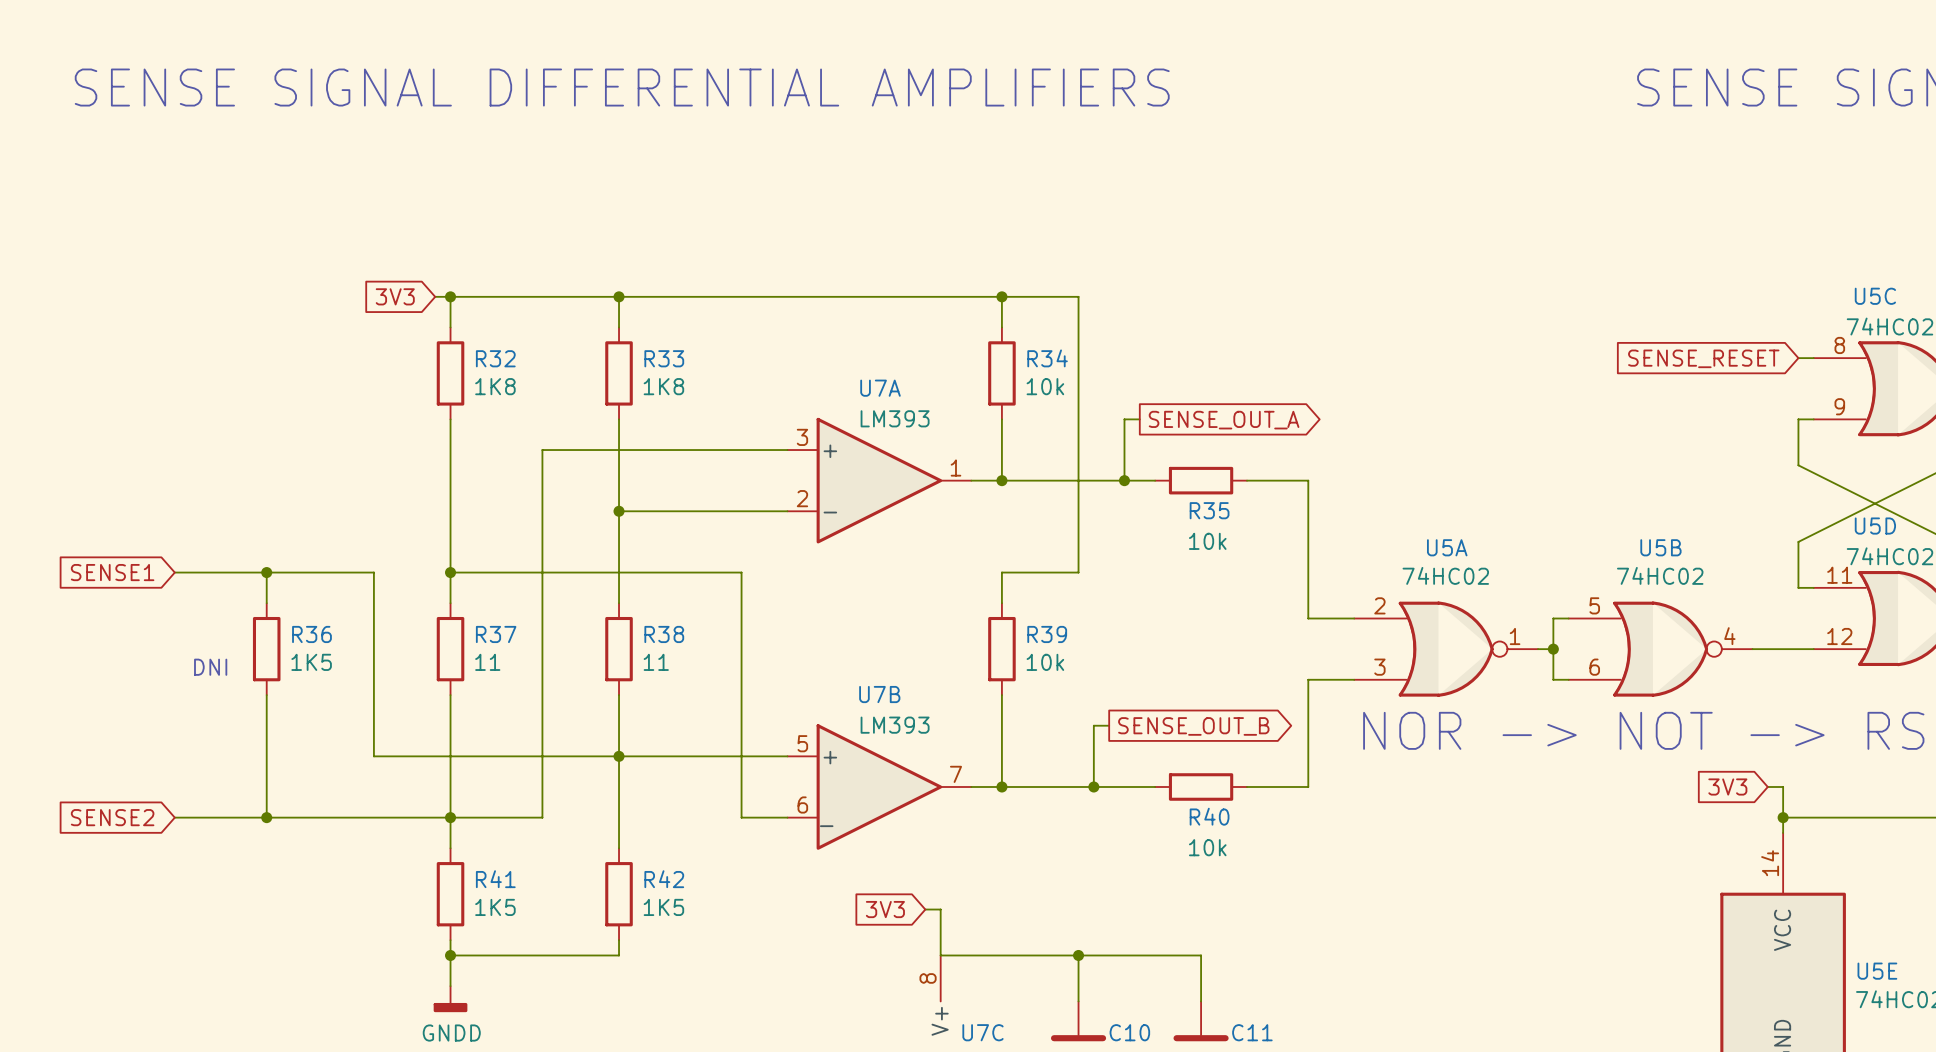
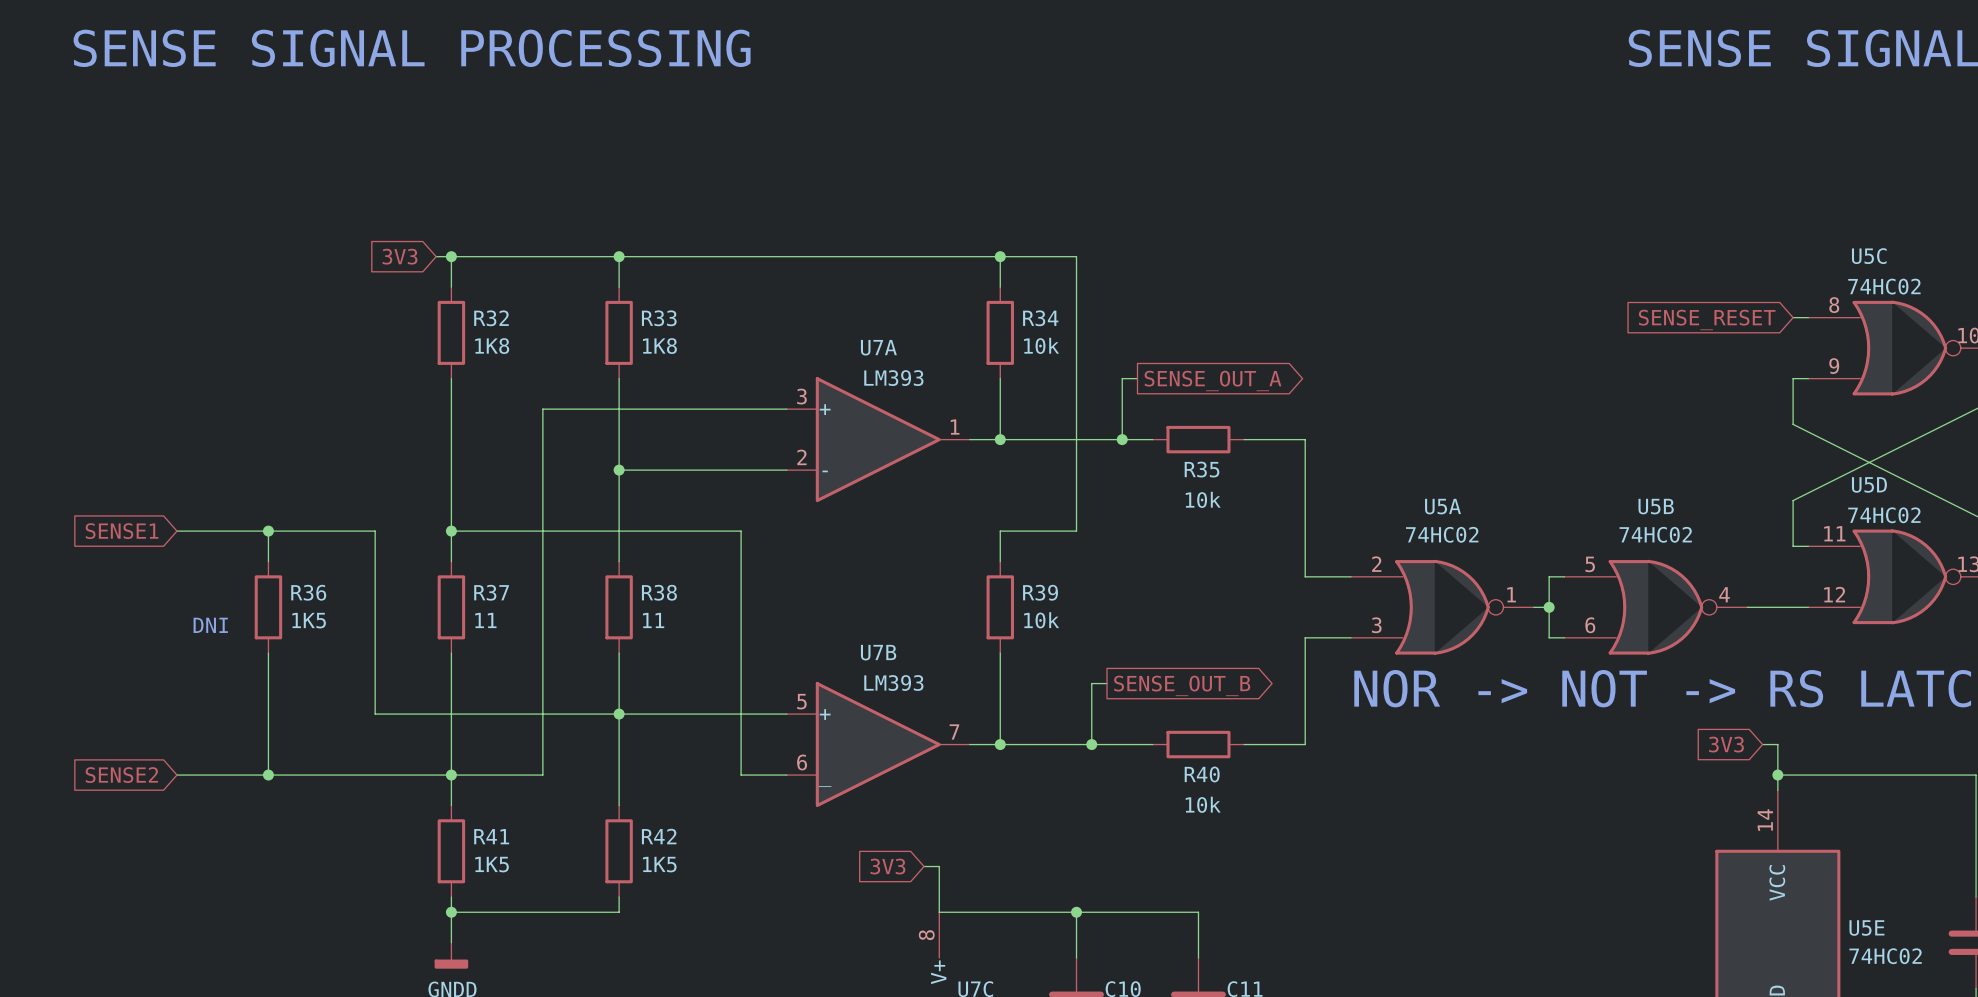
text: SENSE SIGNAL DIFFERENTIAL AMPLIFIERS (622, 87) -> SENSE SIGNAL PROCESSING (412, 48)

